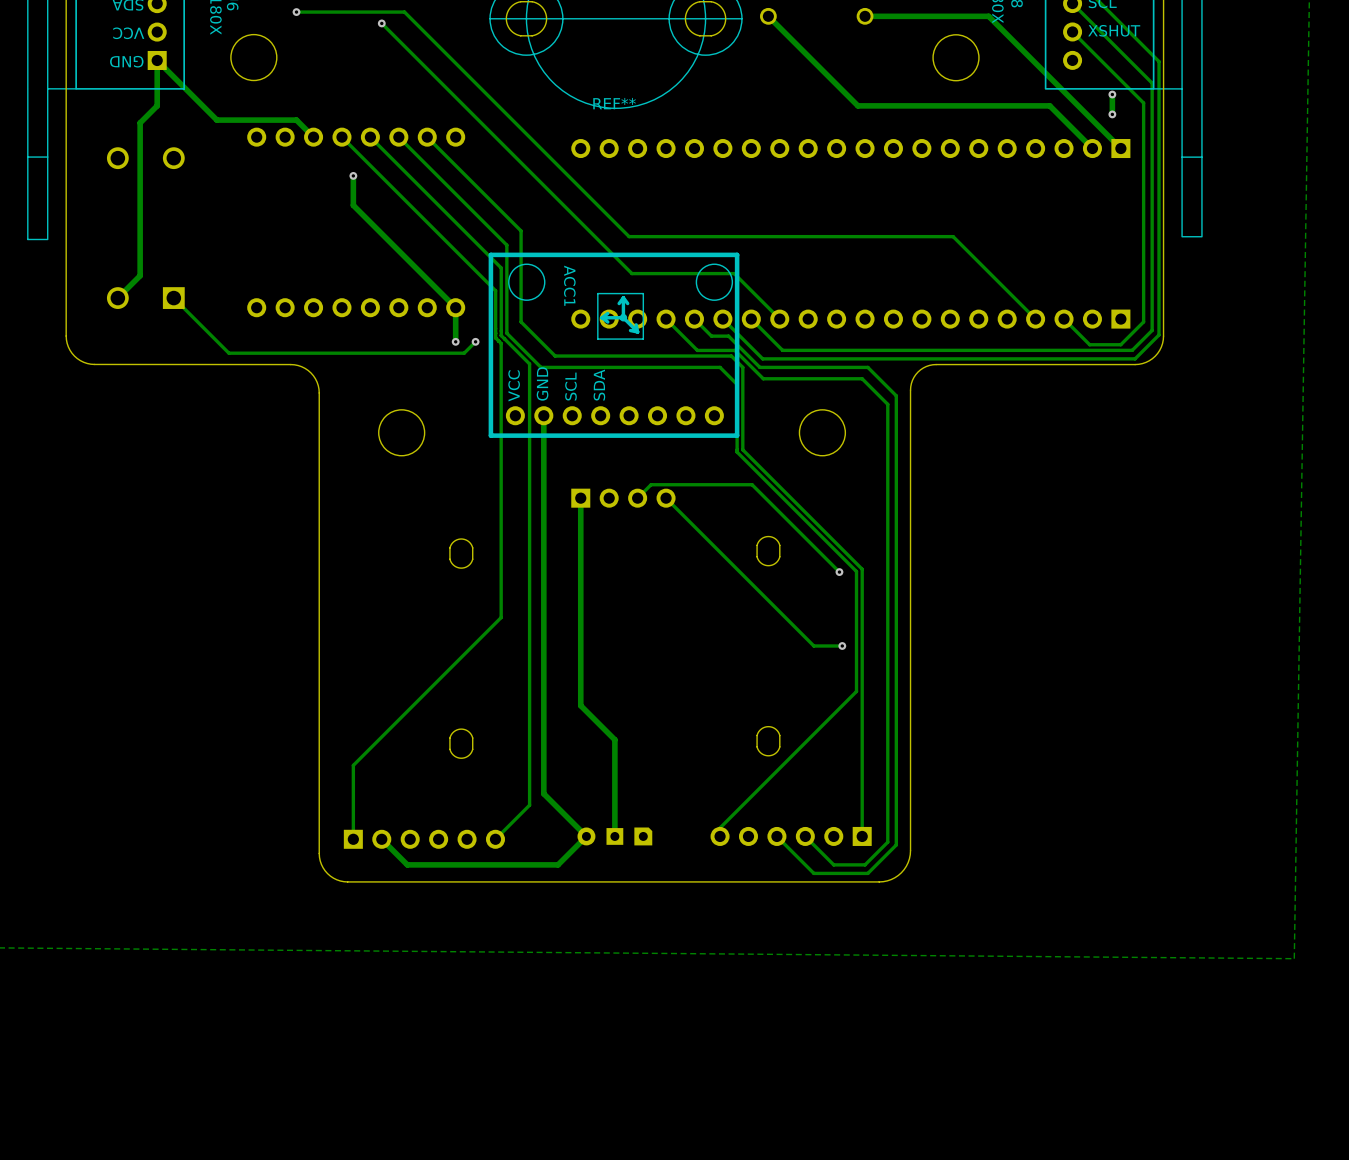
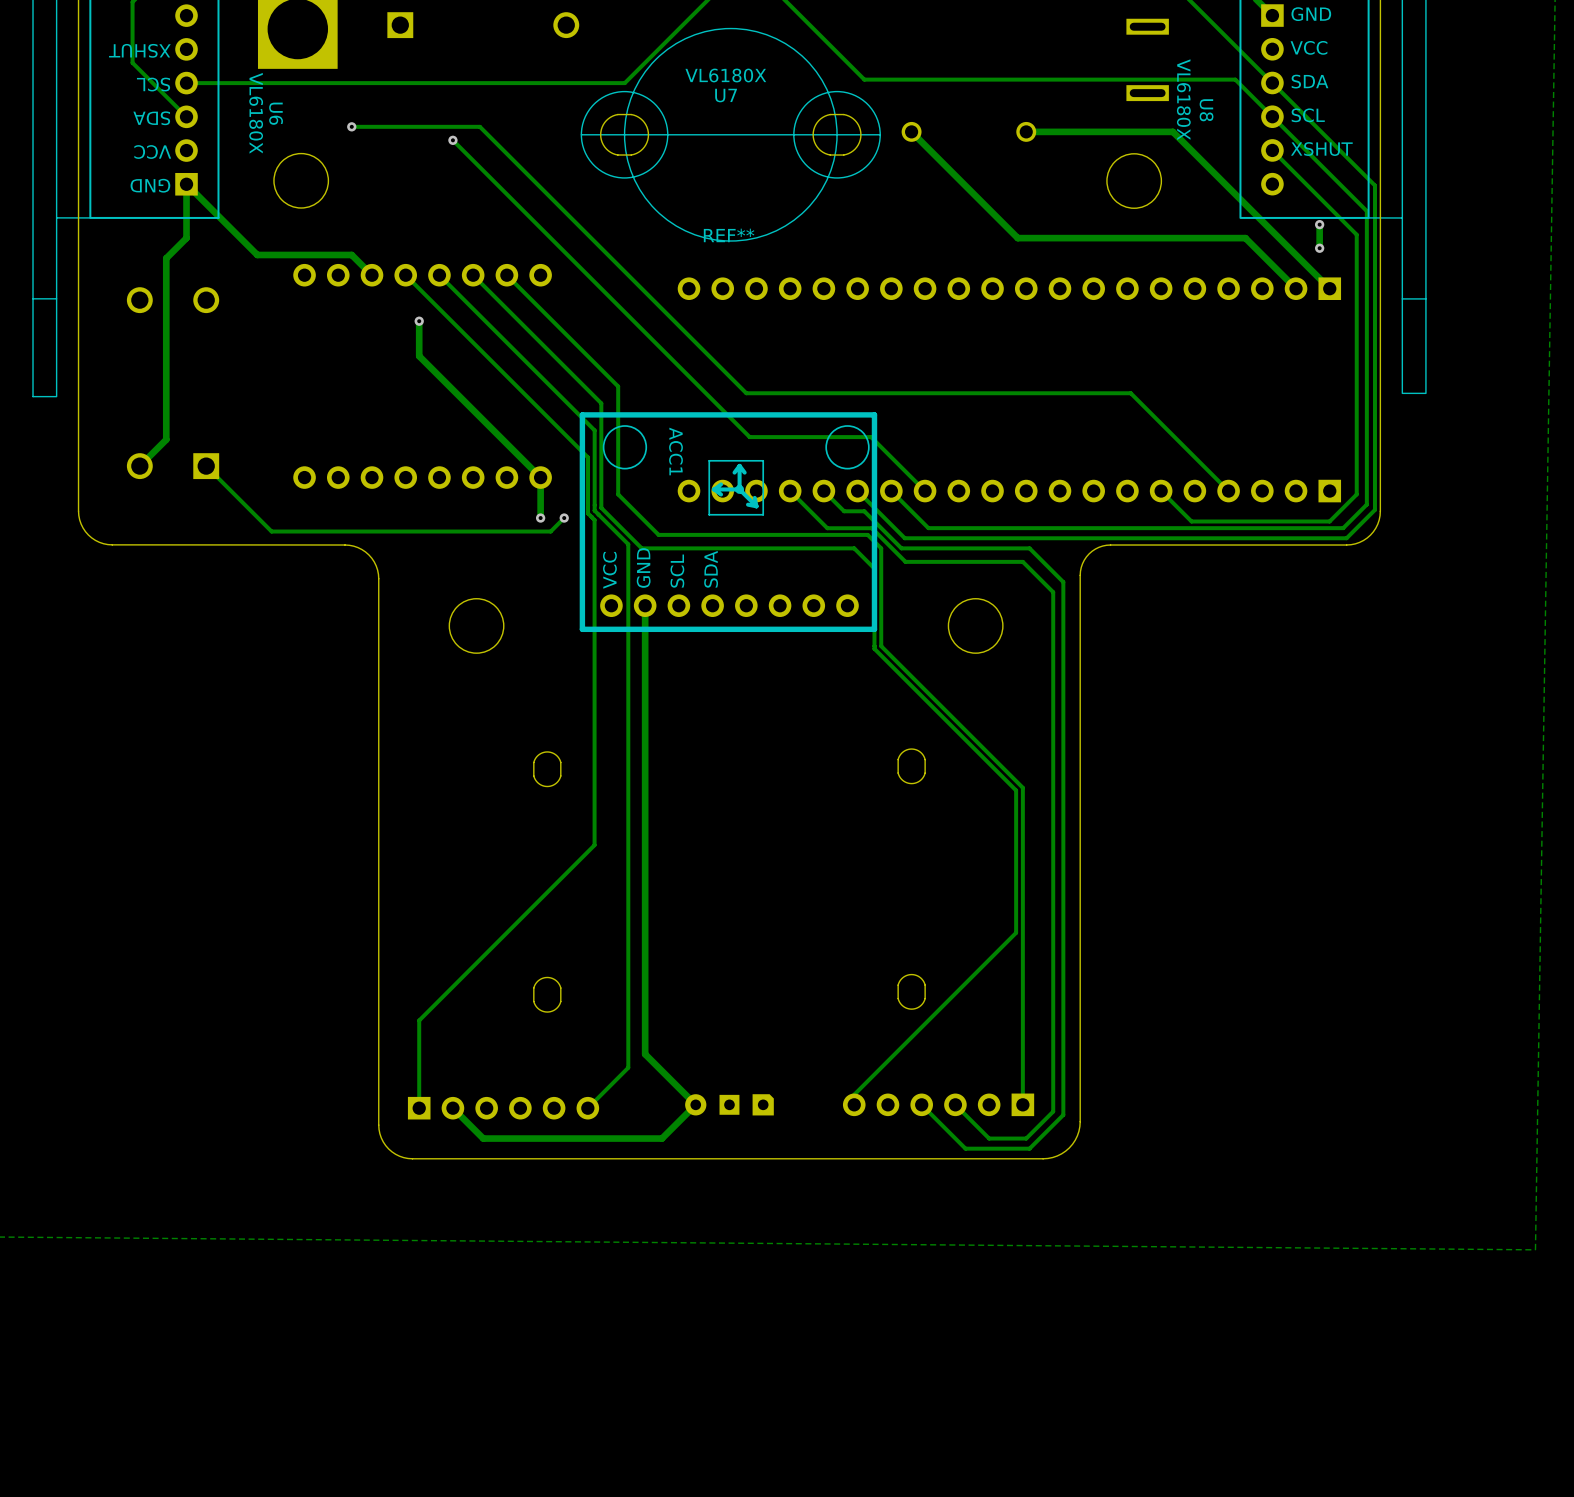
track: (1064, 319) (1089, 344) -> (1161, 491) (1191, 521) (1292, 521)
track: (580, 498) (580, 705) (614, 739) (614, 836) -> none
part: (623, 498) -> none
track: (637, 498) (651, 484) (752, 484) (839, 572) -> none
track: (666, 498) (813, 645) (842, 645) -> none
via: (839, 572) -> none
via: (842, 645) -> none

